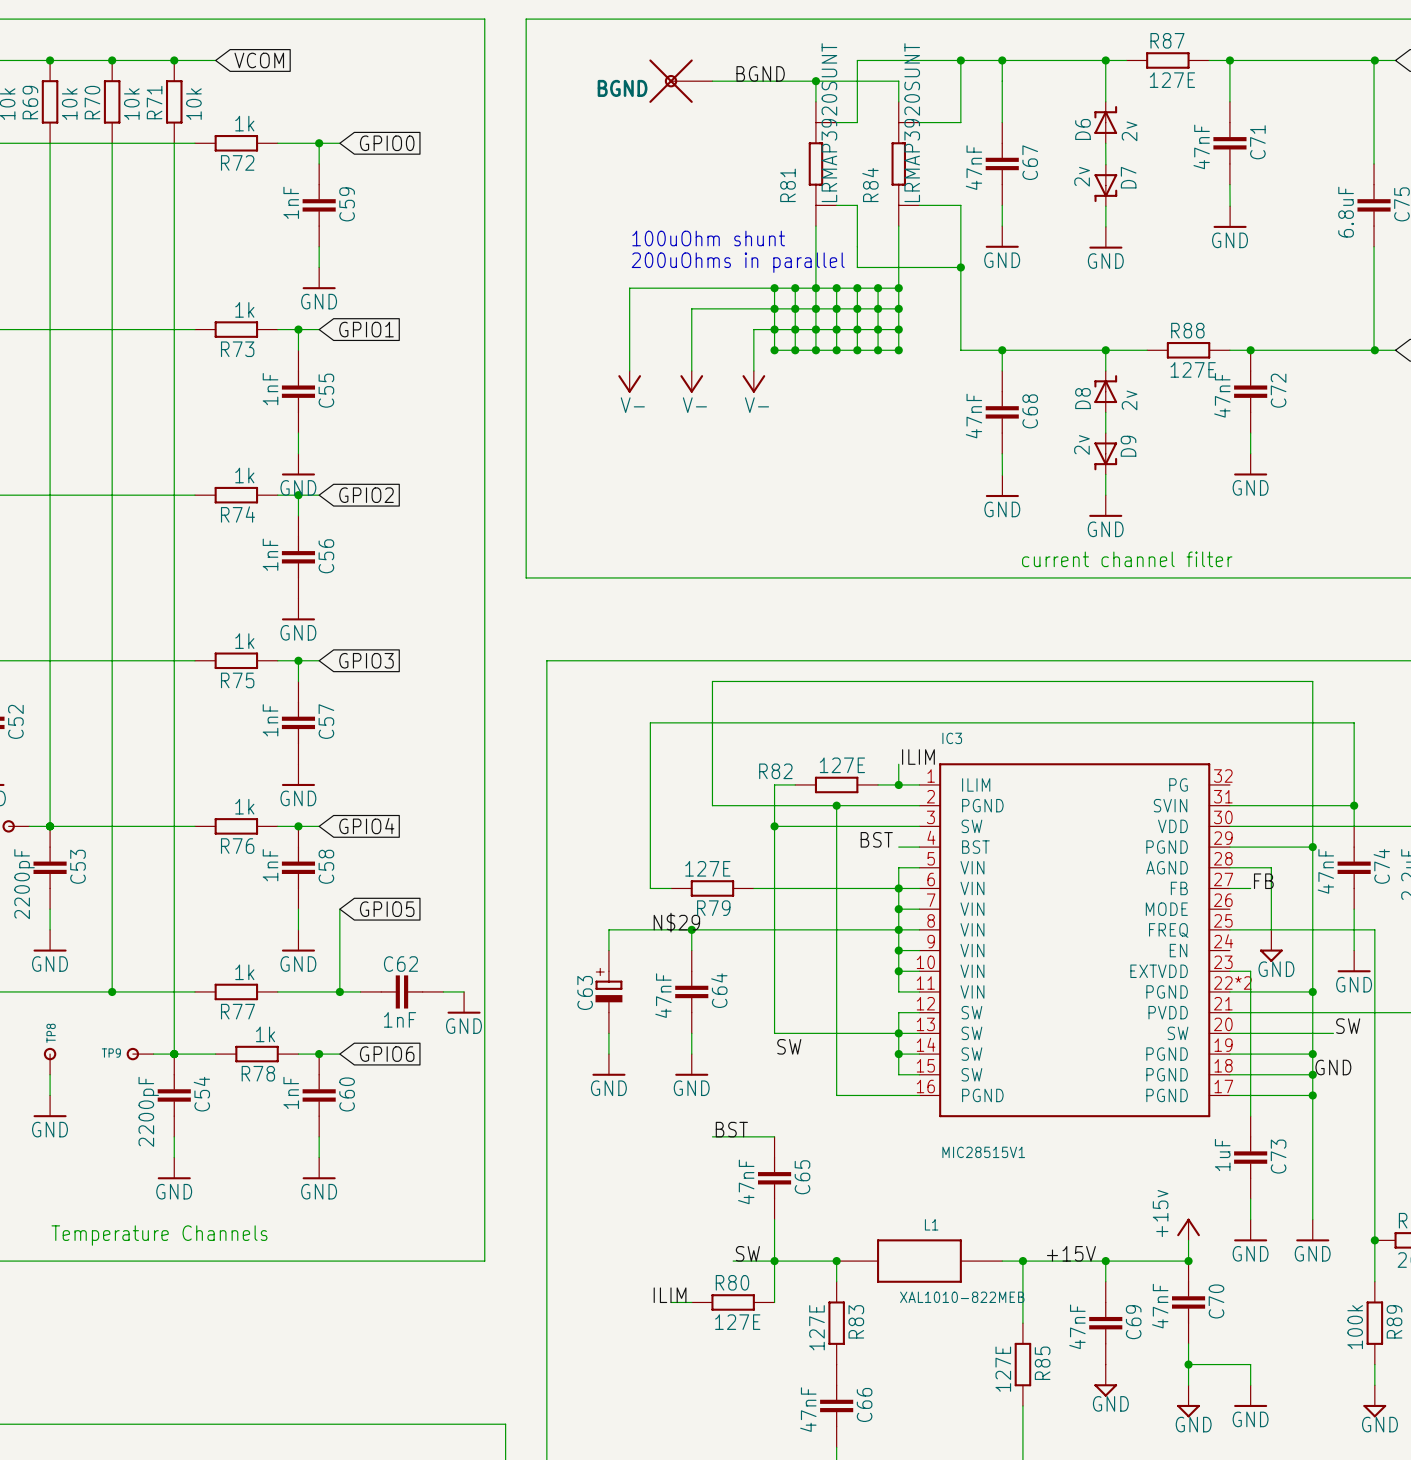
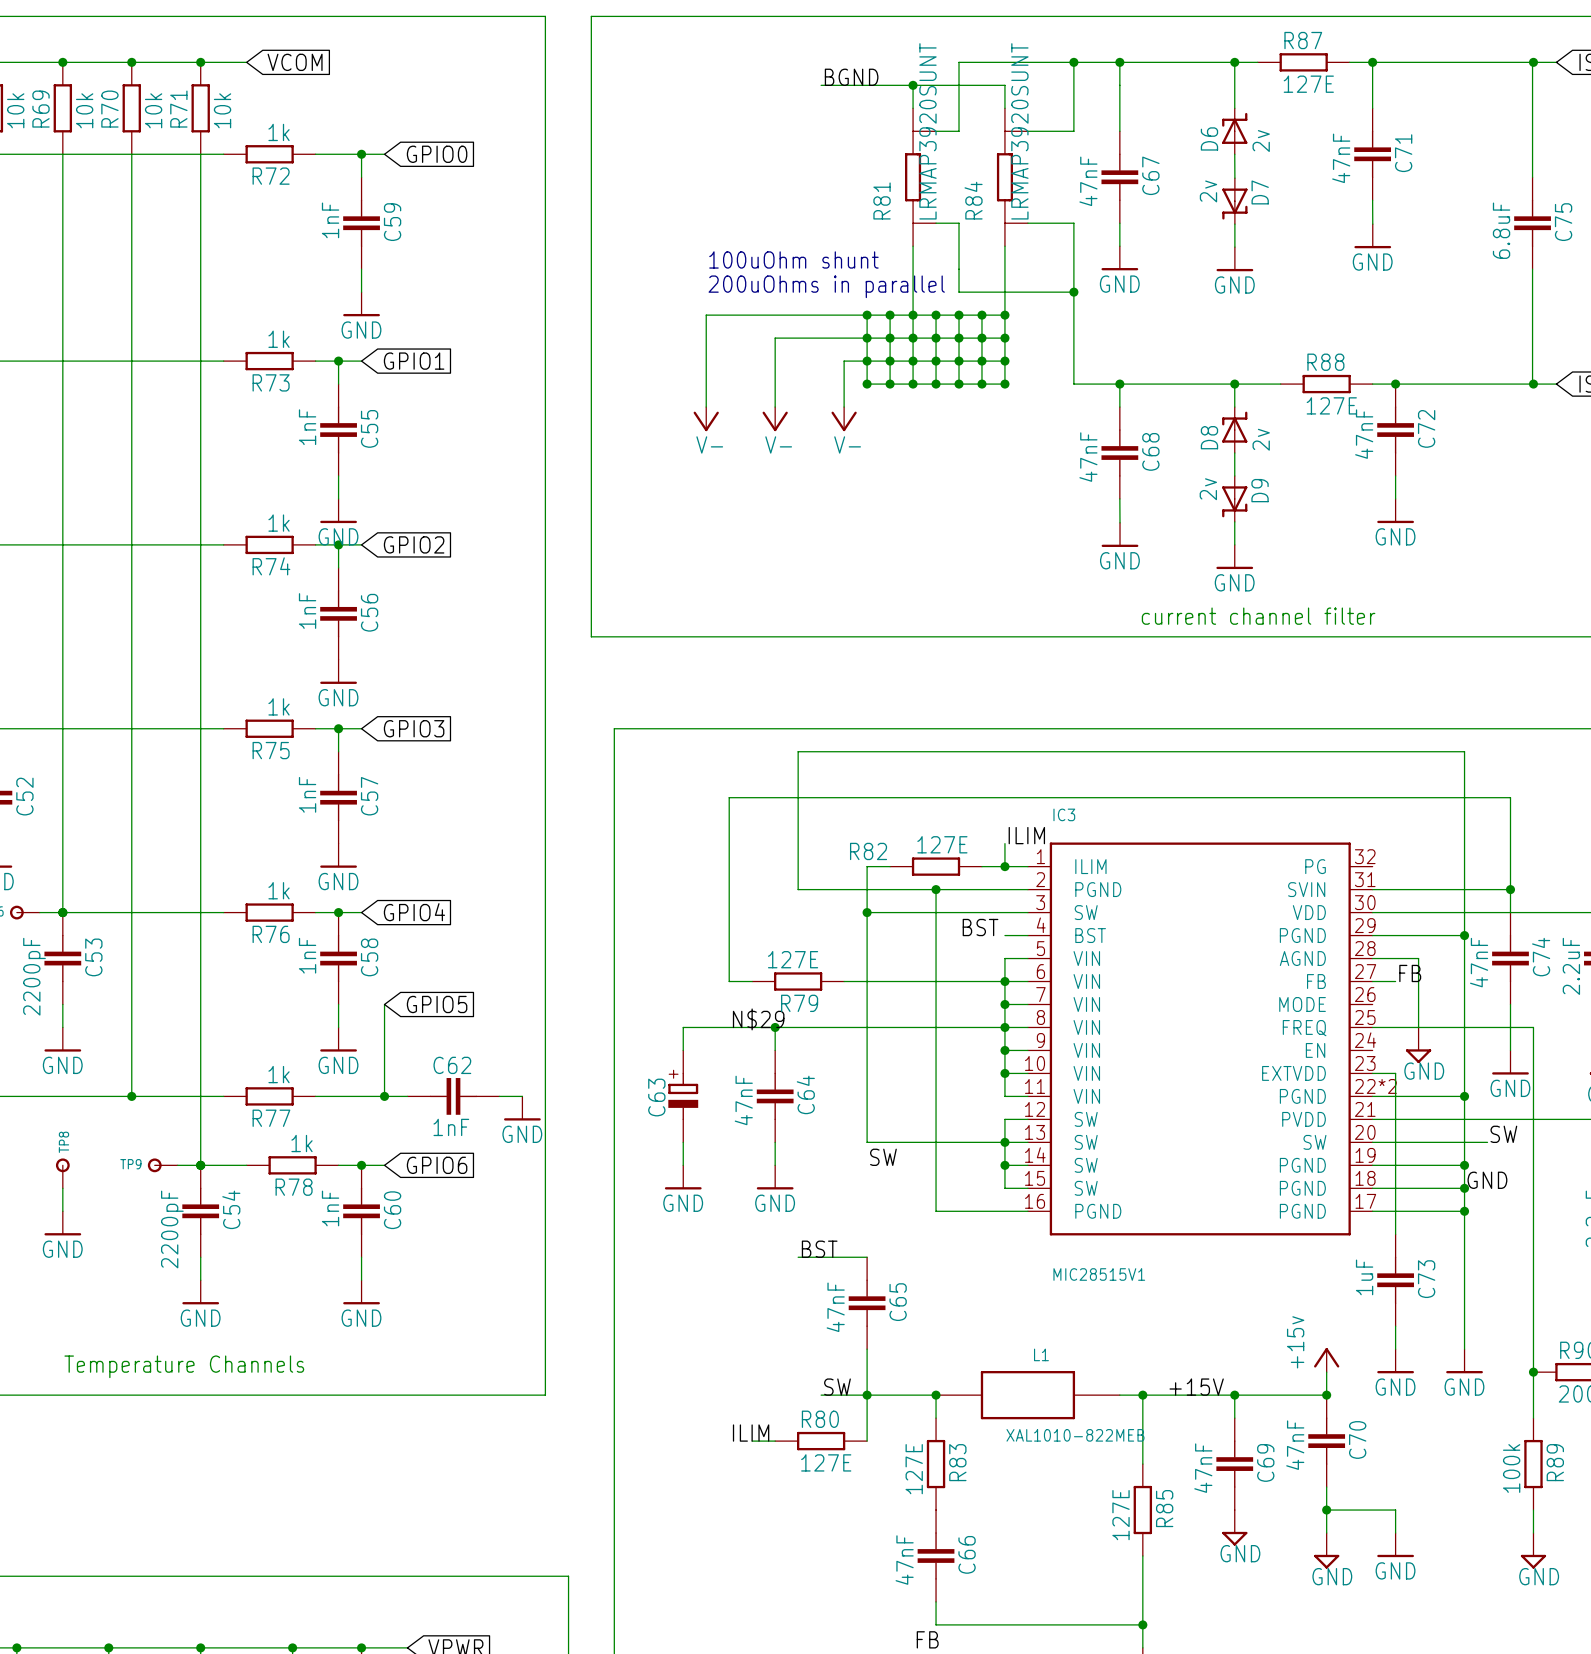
BGND: (680, 81) -> none
wire: (712, 81) (733, 81) -> none

